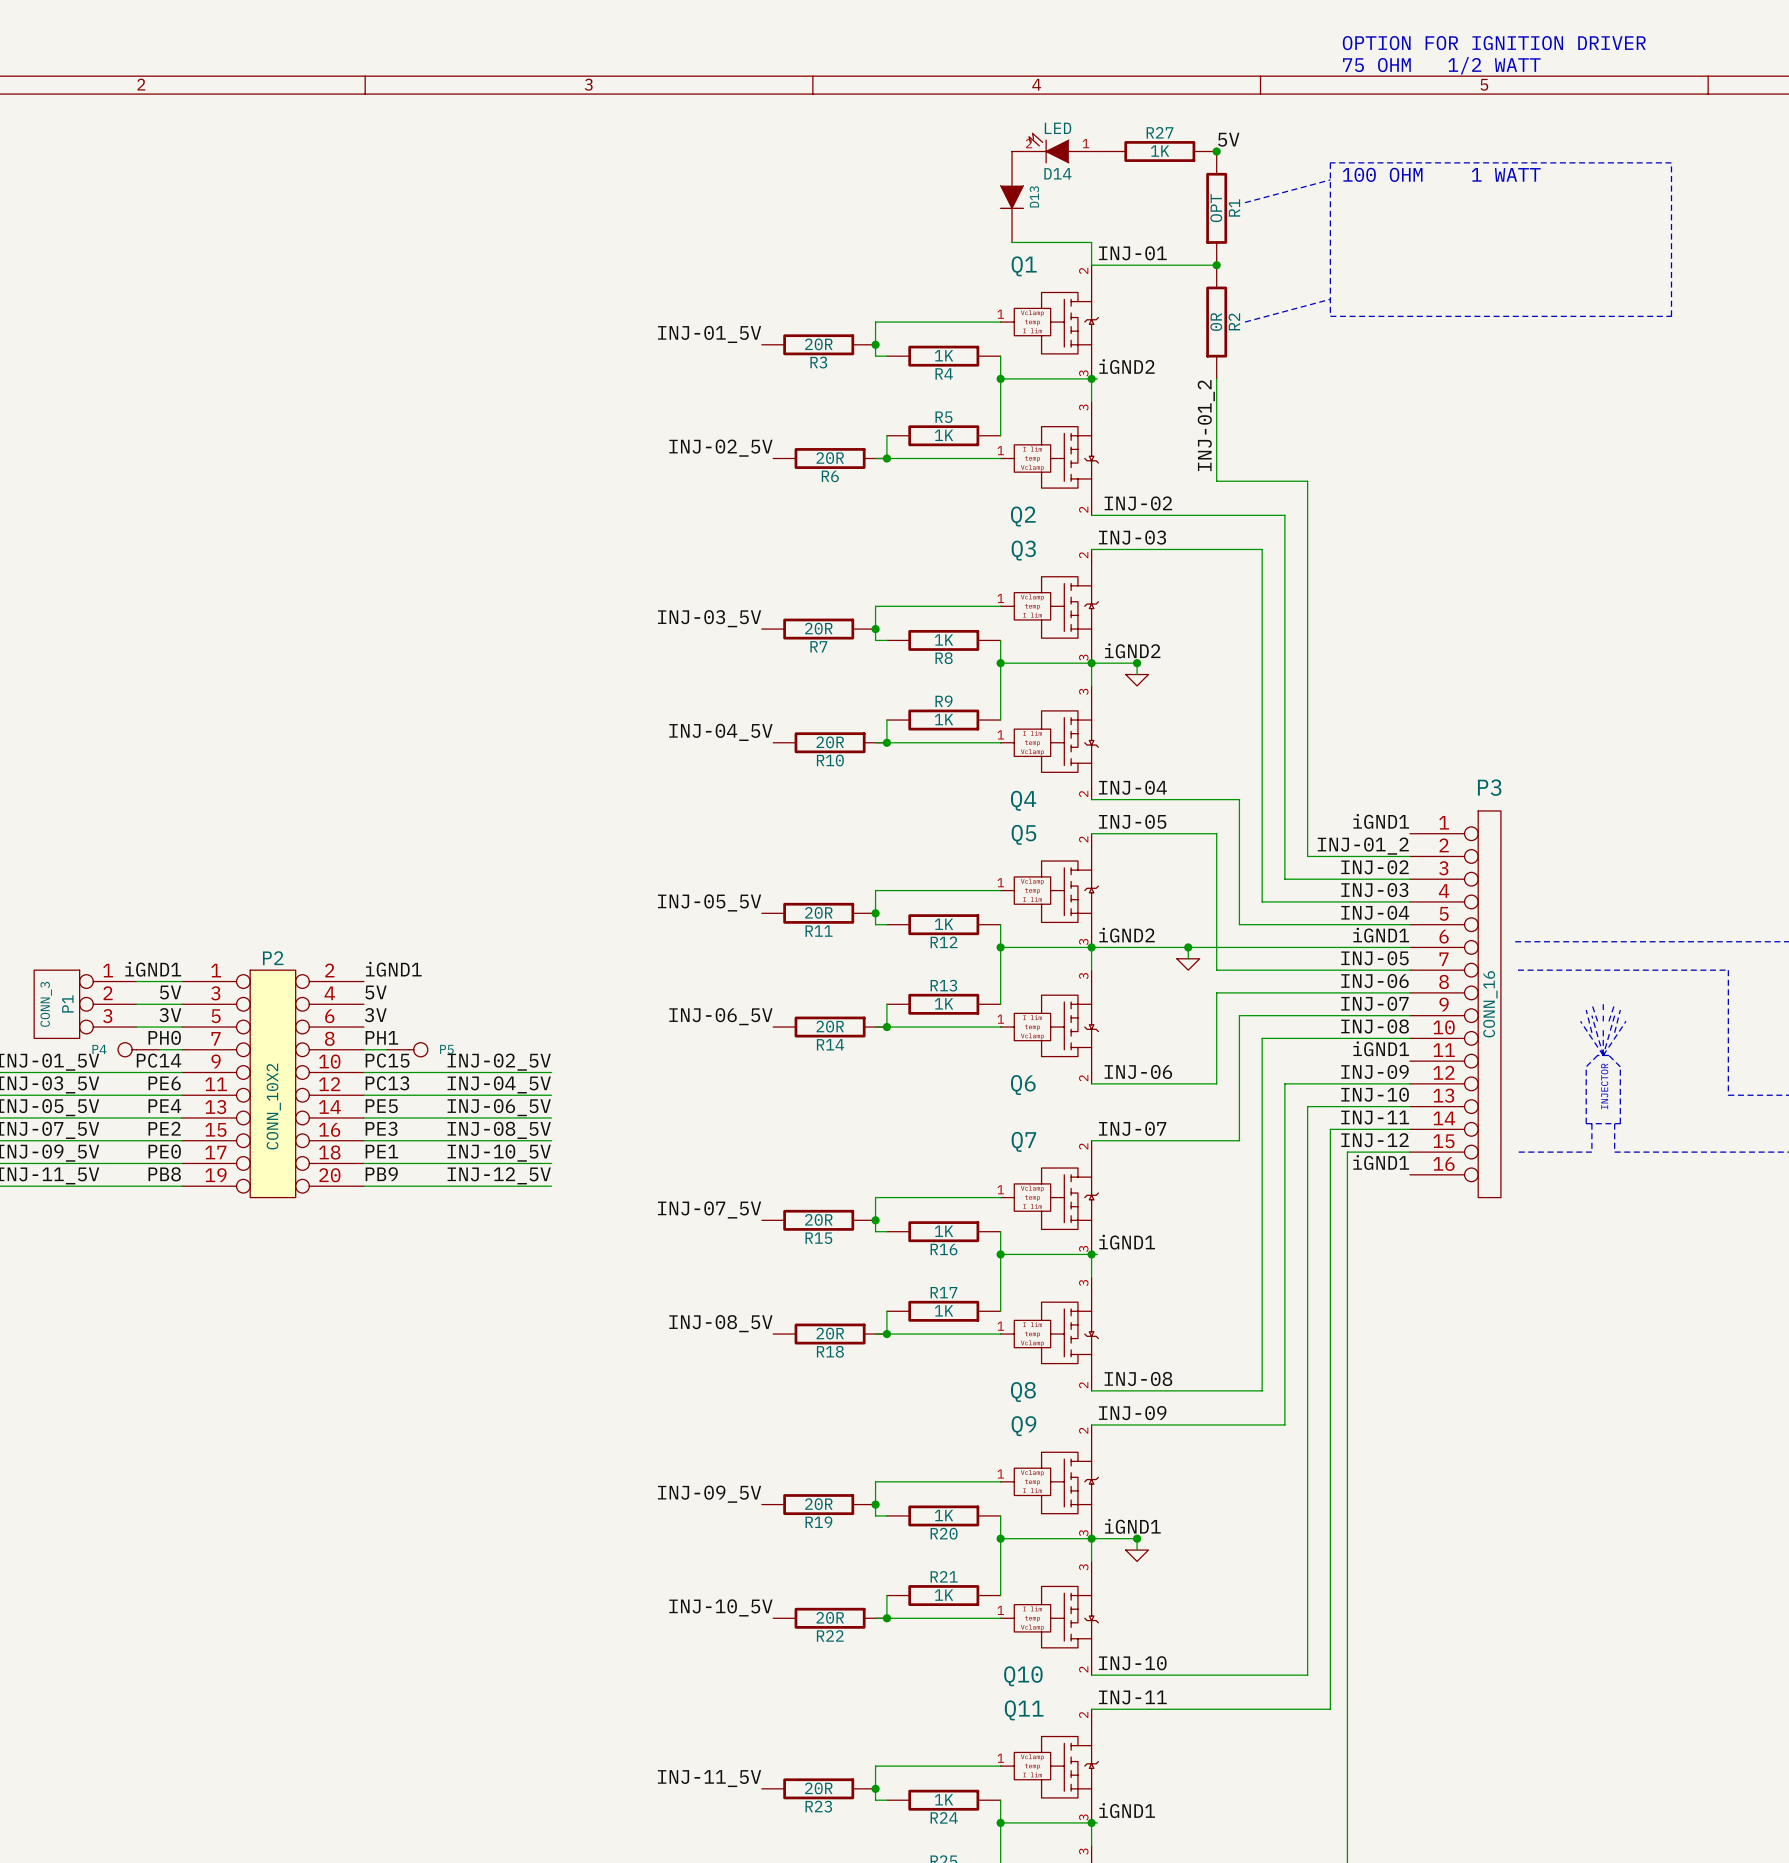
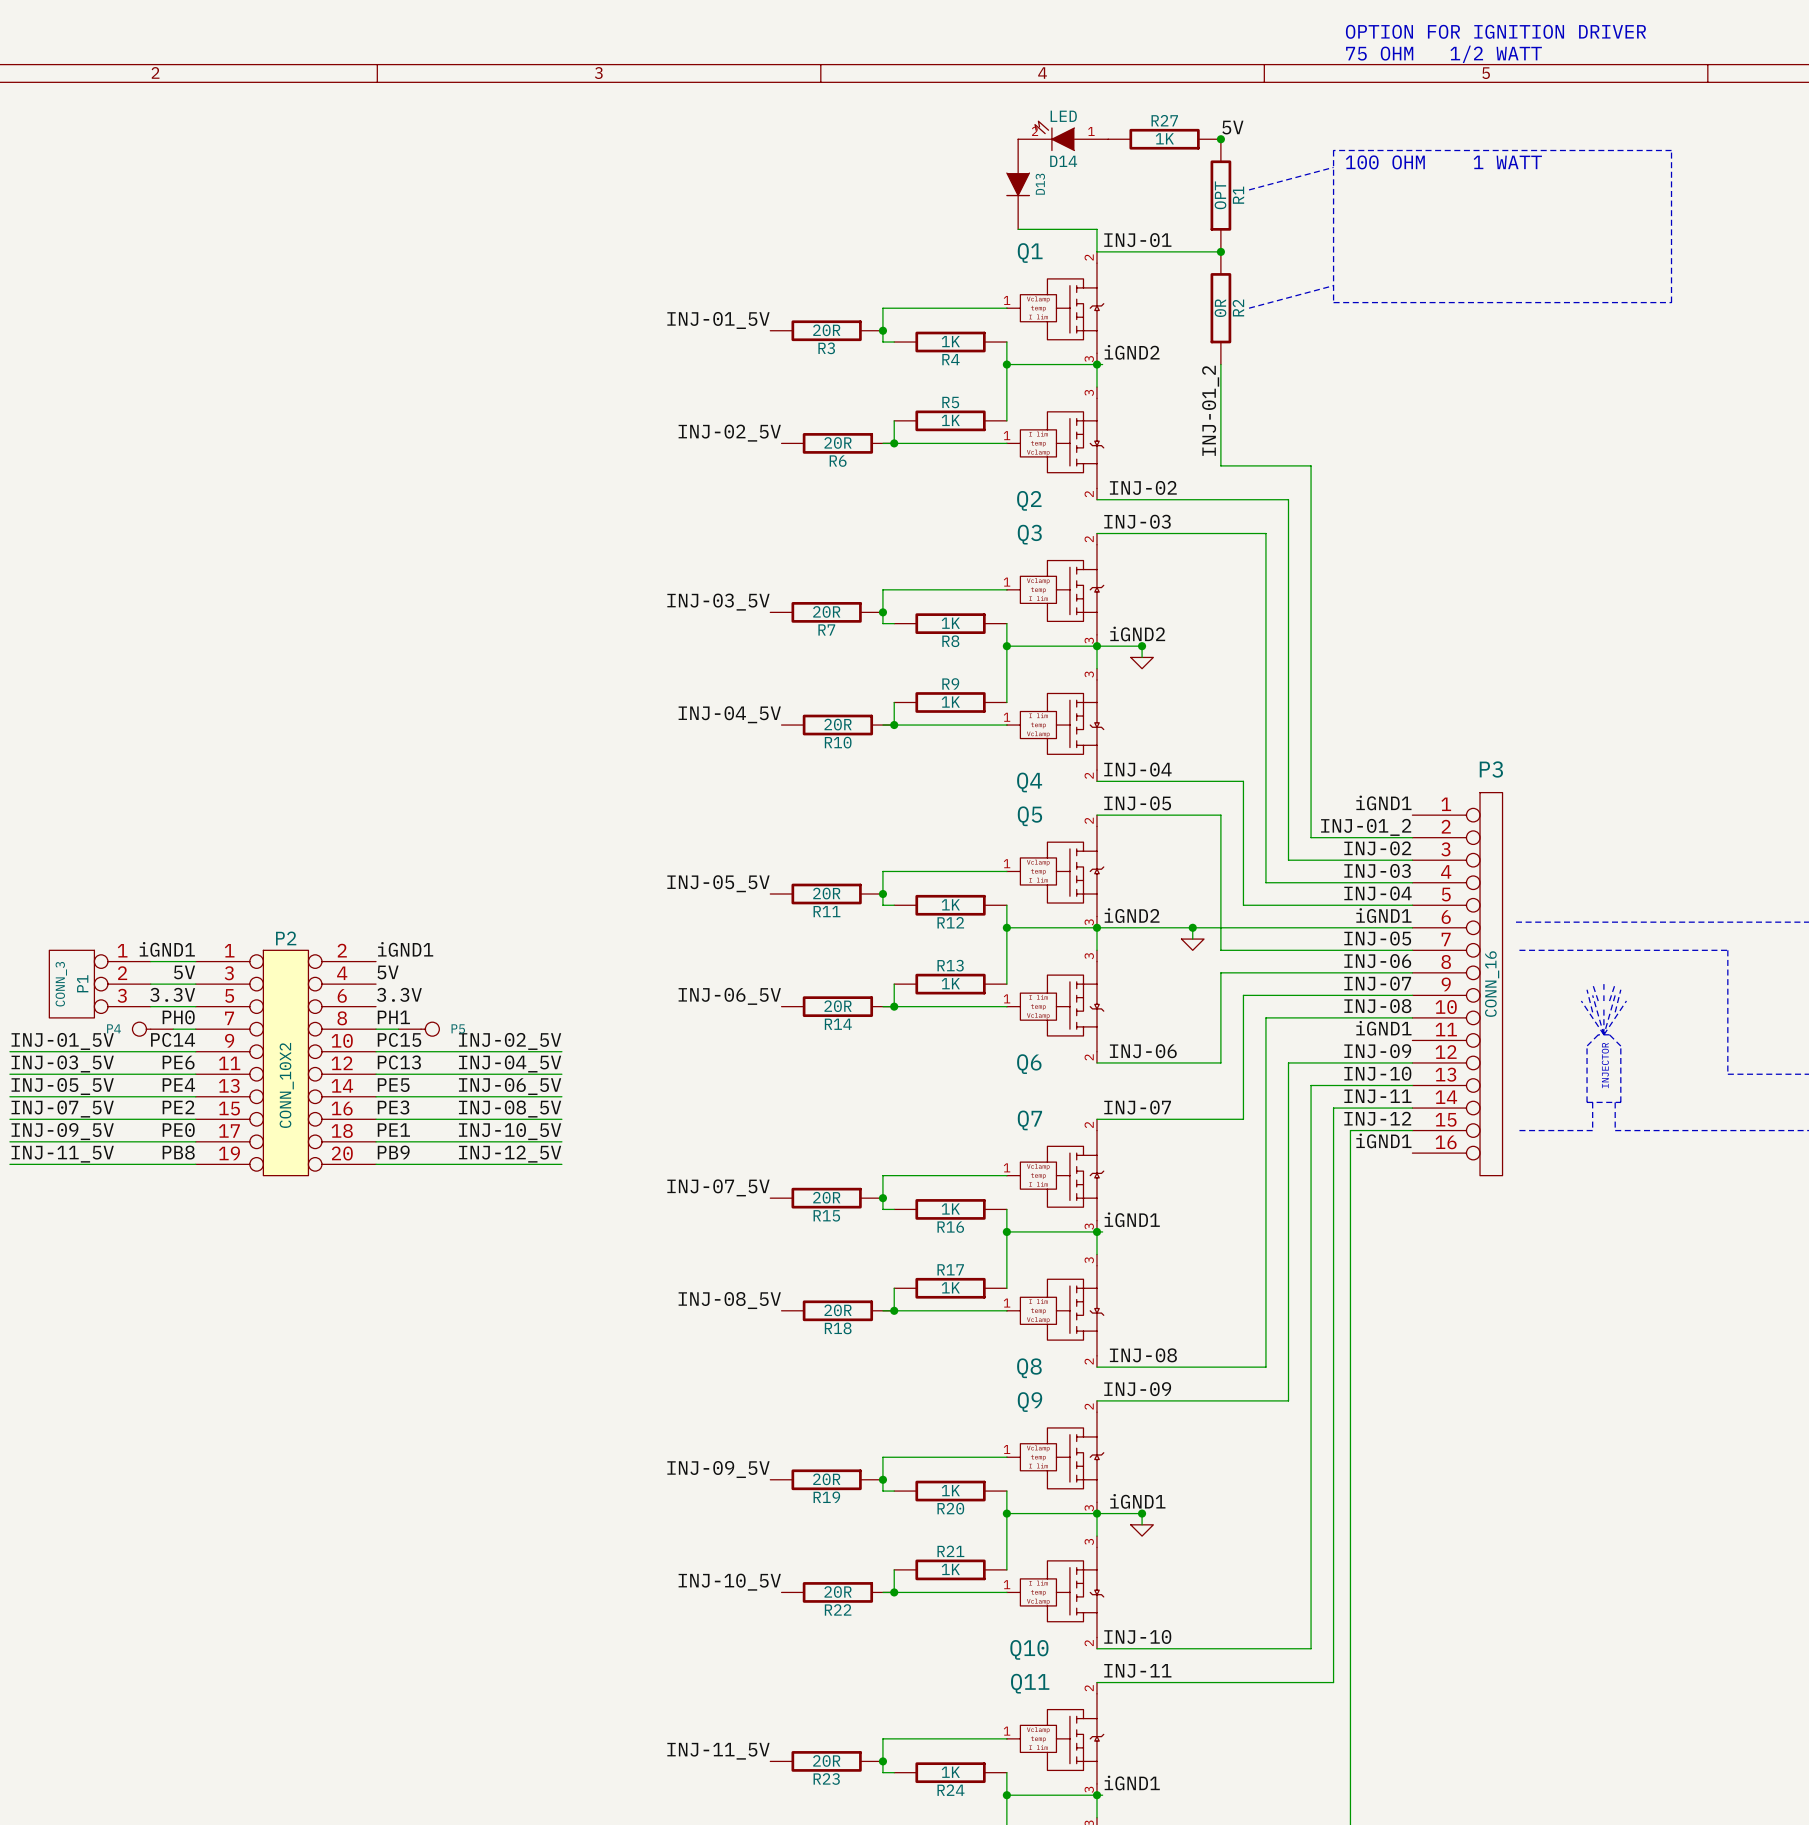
label: 3V (170, 1015) -> 3.3V (172, 994)
label: 3V (375, 1015) -> 3.3V (399, 994)

